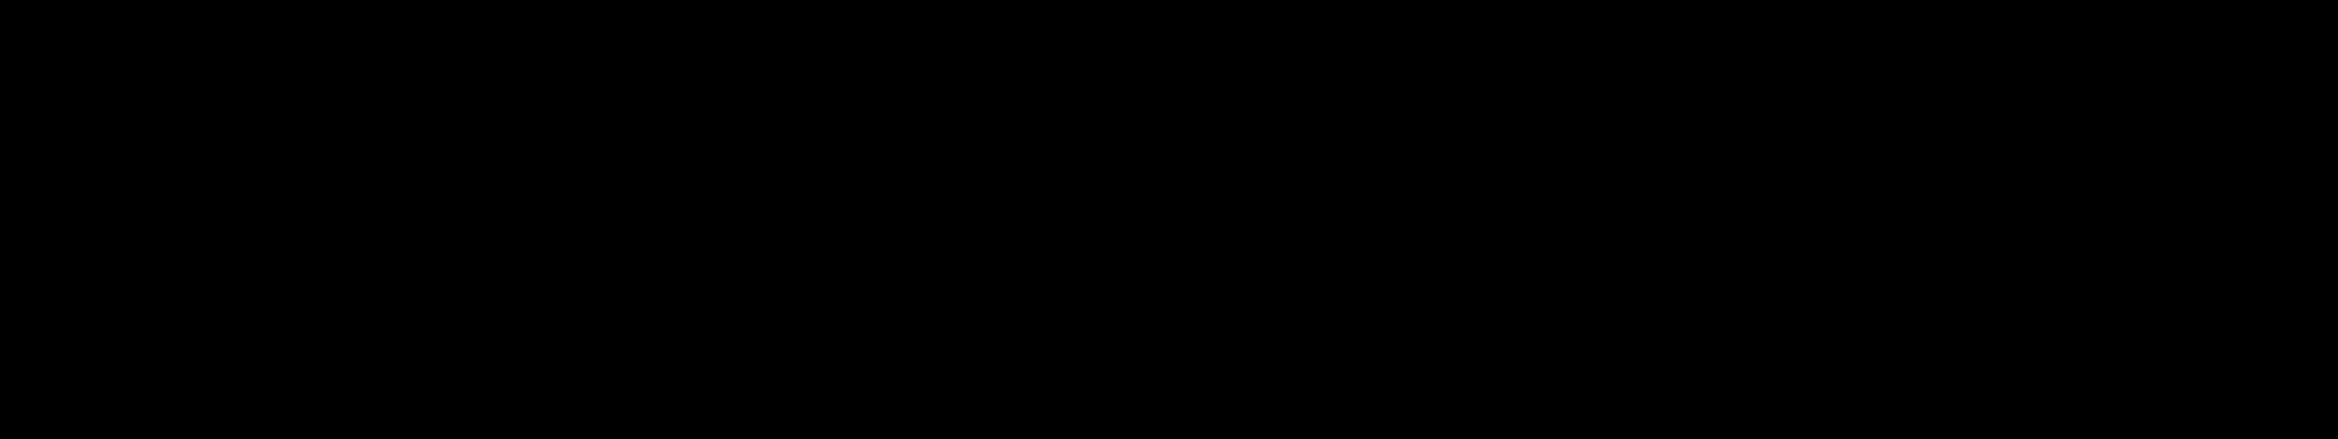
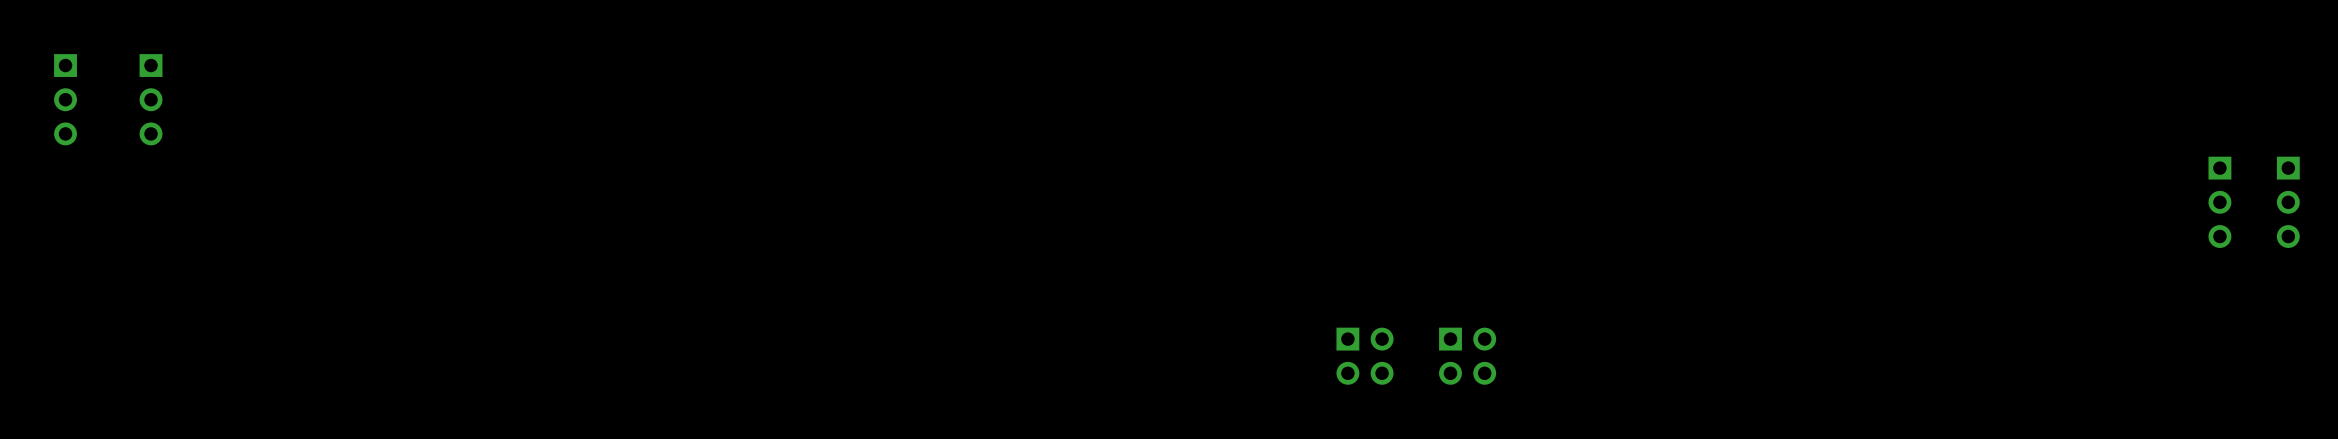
part: none -> (65, 99)
part: none -> (151, 99)
part: none -> (2219, 202)
part: none -> (2288, 202)
part: none -> (1365, 356)
part: none -> (1467, 356)

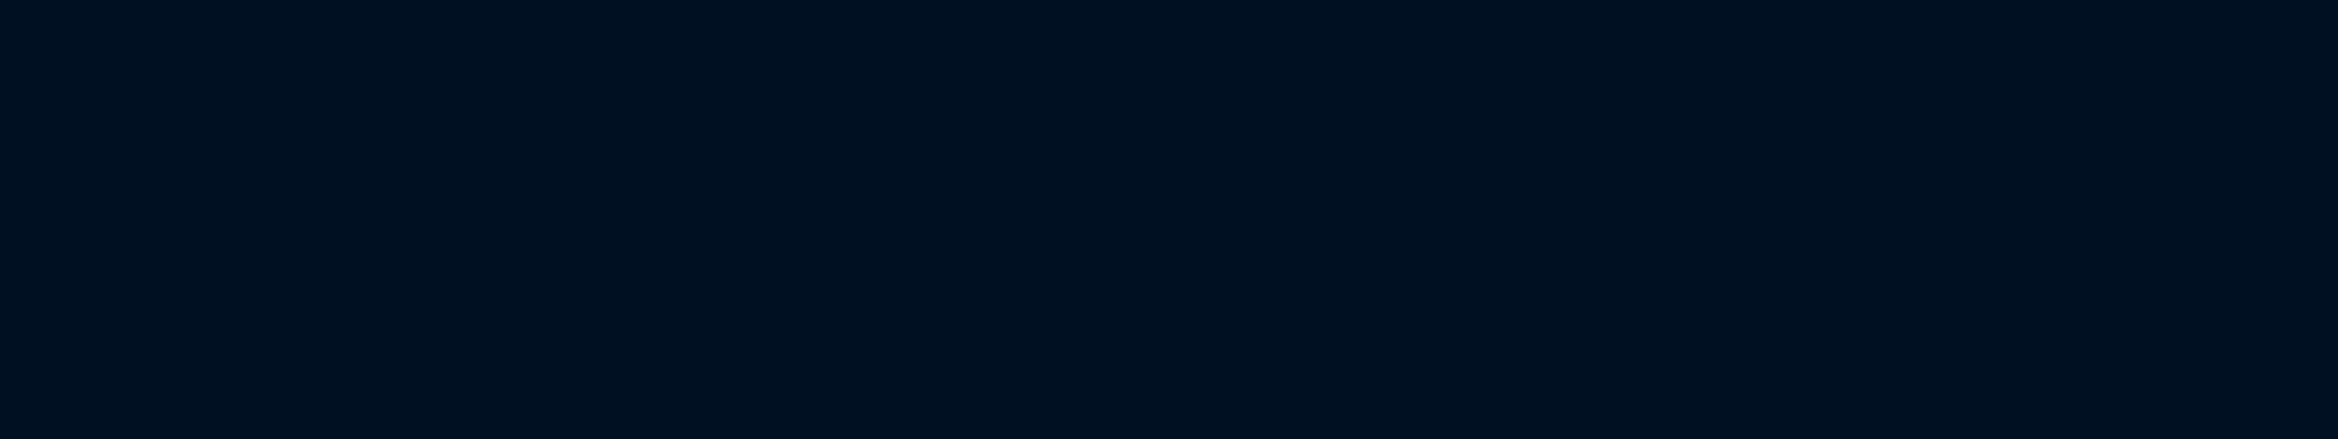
part: (65, 99) -> none
part: (151, 99) -> none
part: (2219, 202) -> none
part: (2288, 202) -> none
part: (1365, 356) -> none
part: (1467, 356) -> none

